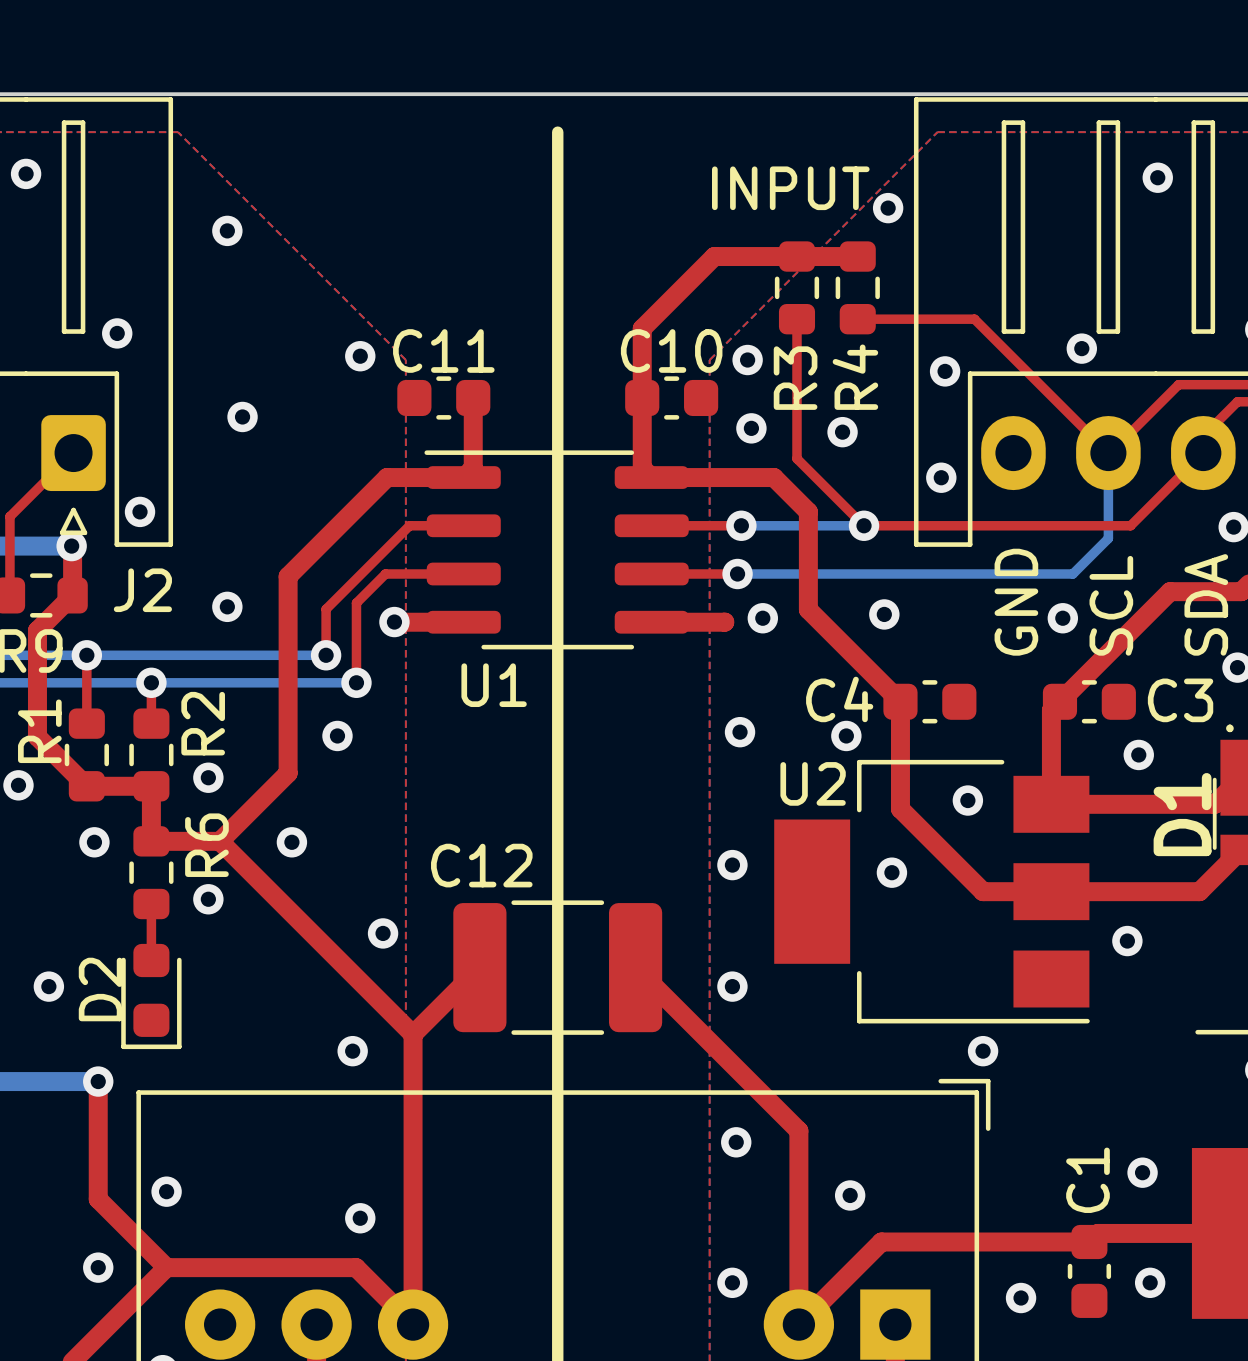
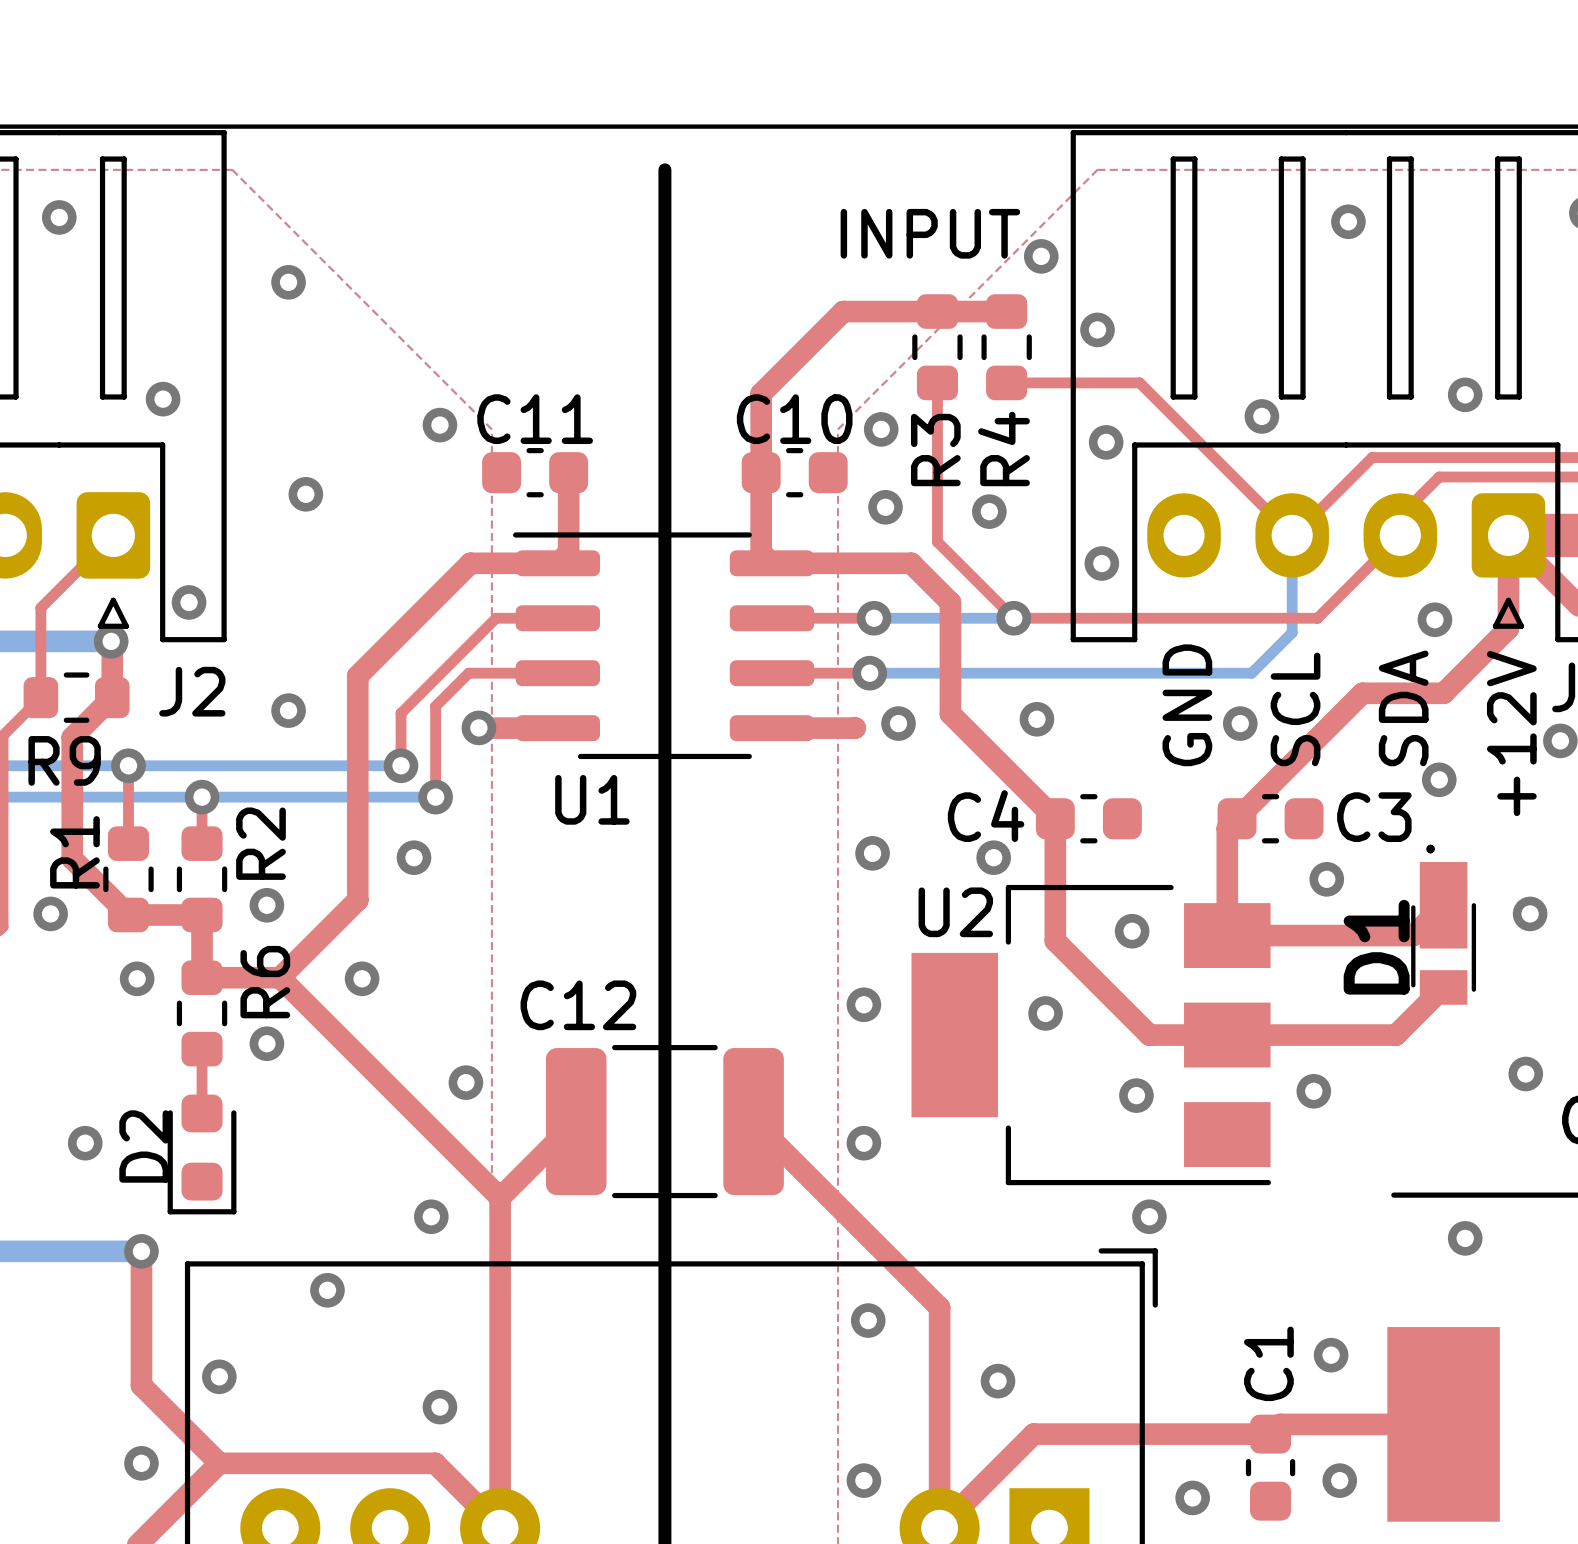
via: none -> (1097, 329)
via: none -> (1136, 1095)
via: none -> (327, 1290)

